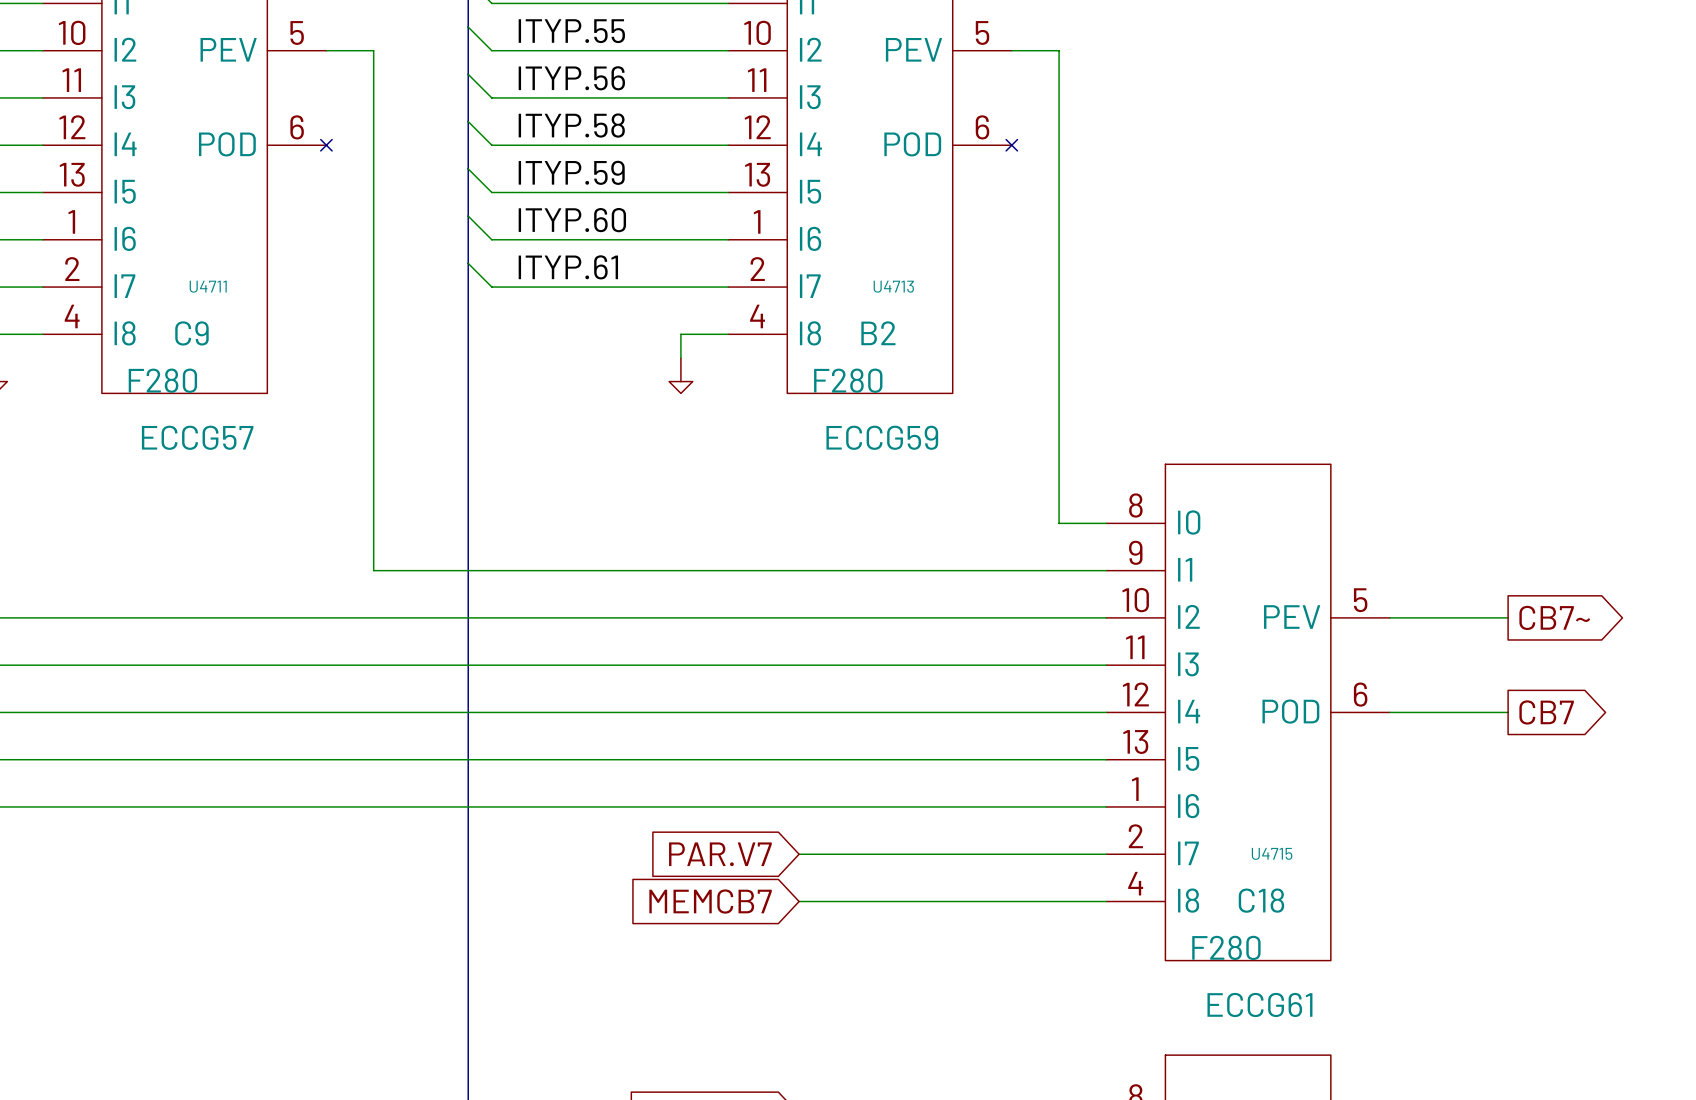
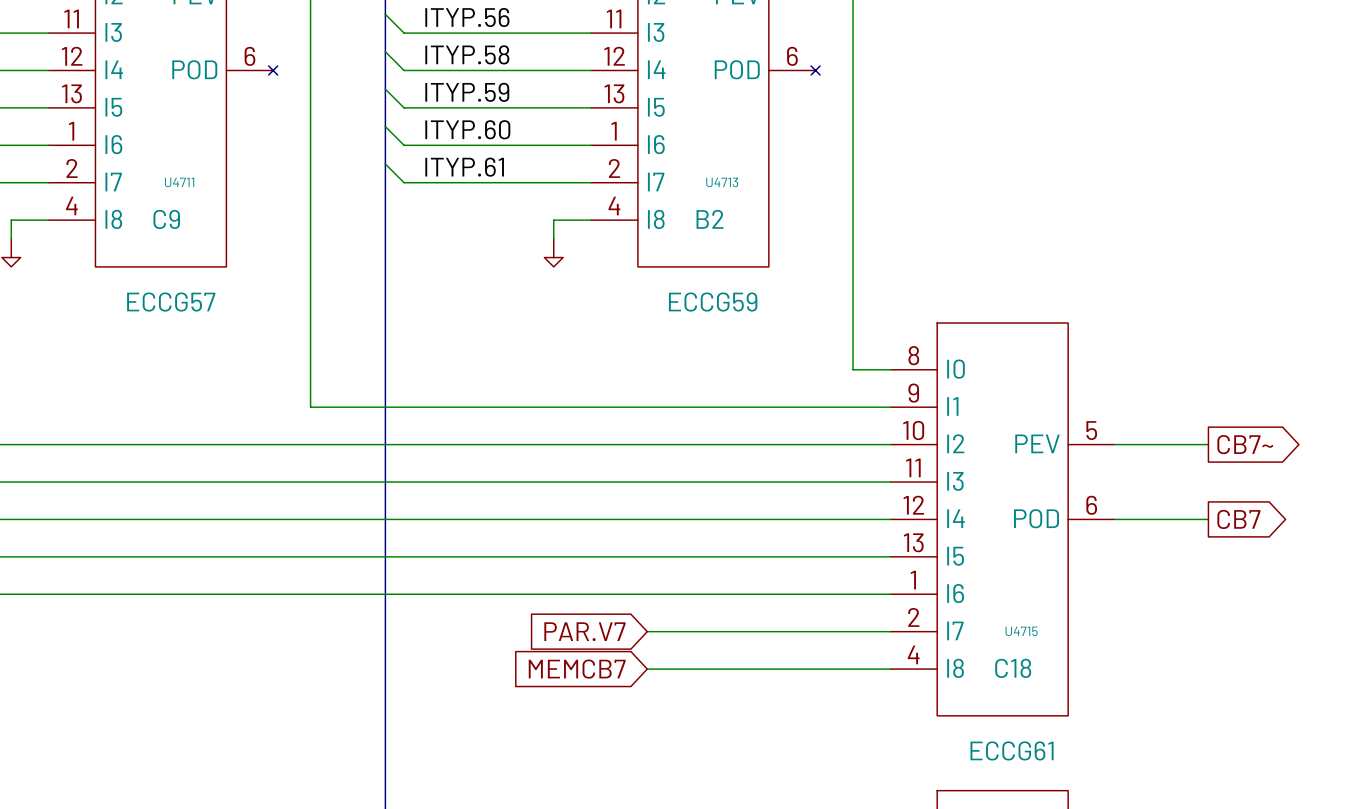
U4711 value: F280 (162, 380) -> none
U4713 value: F280 (848, 380) -> none
U4715 value: F280 (1226, 947) -> none

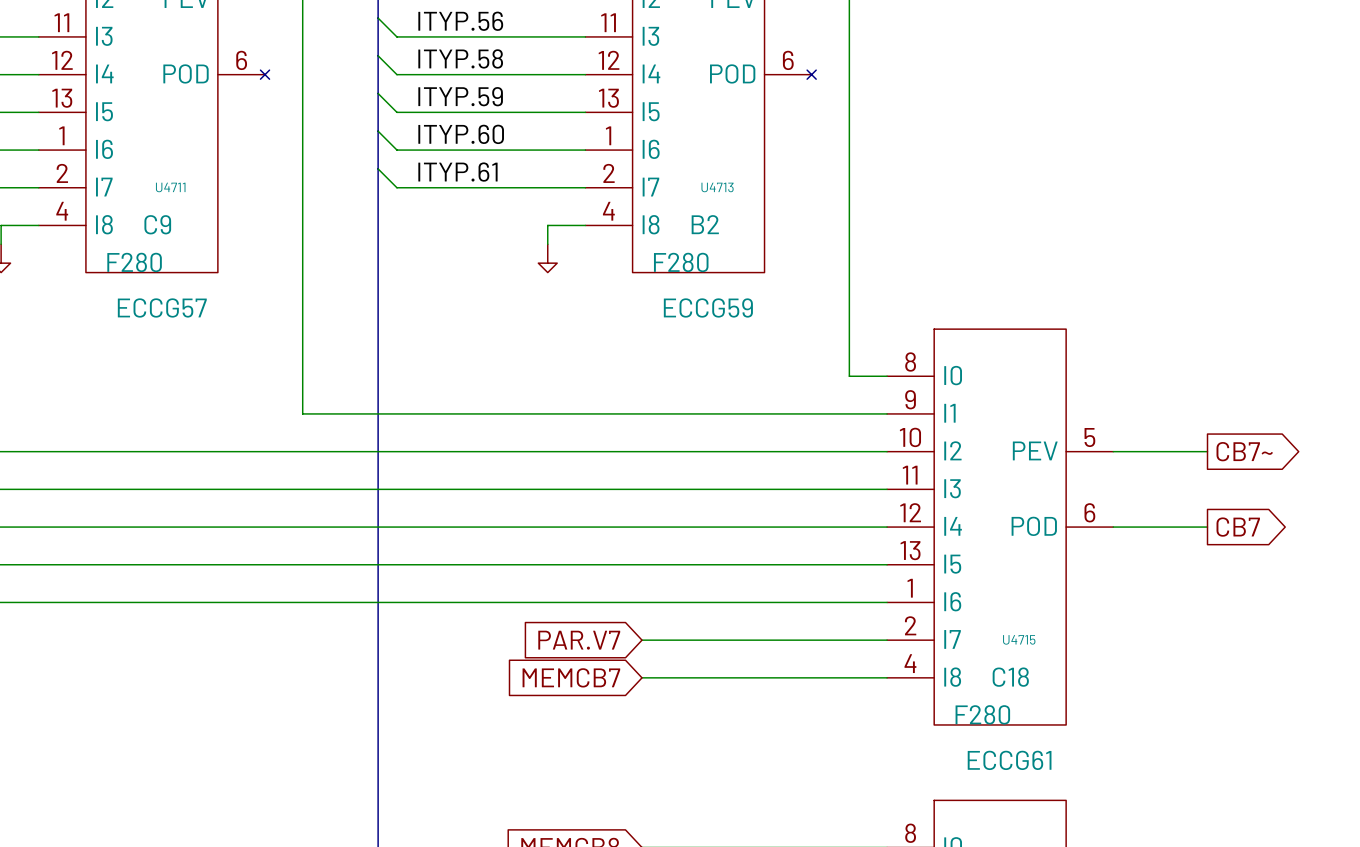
U4711 value: none -> F280 (134, 262)
U4713 value: none -> F280 (681, 262)
U4715 value: none -> F280 (982, 714)

